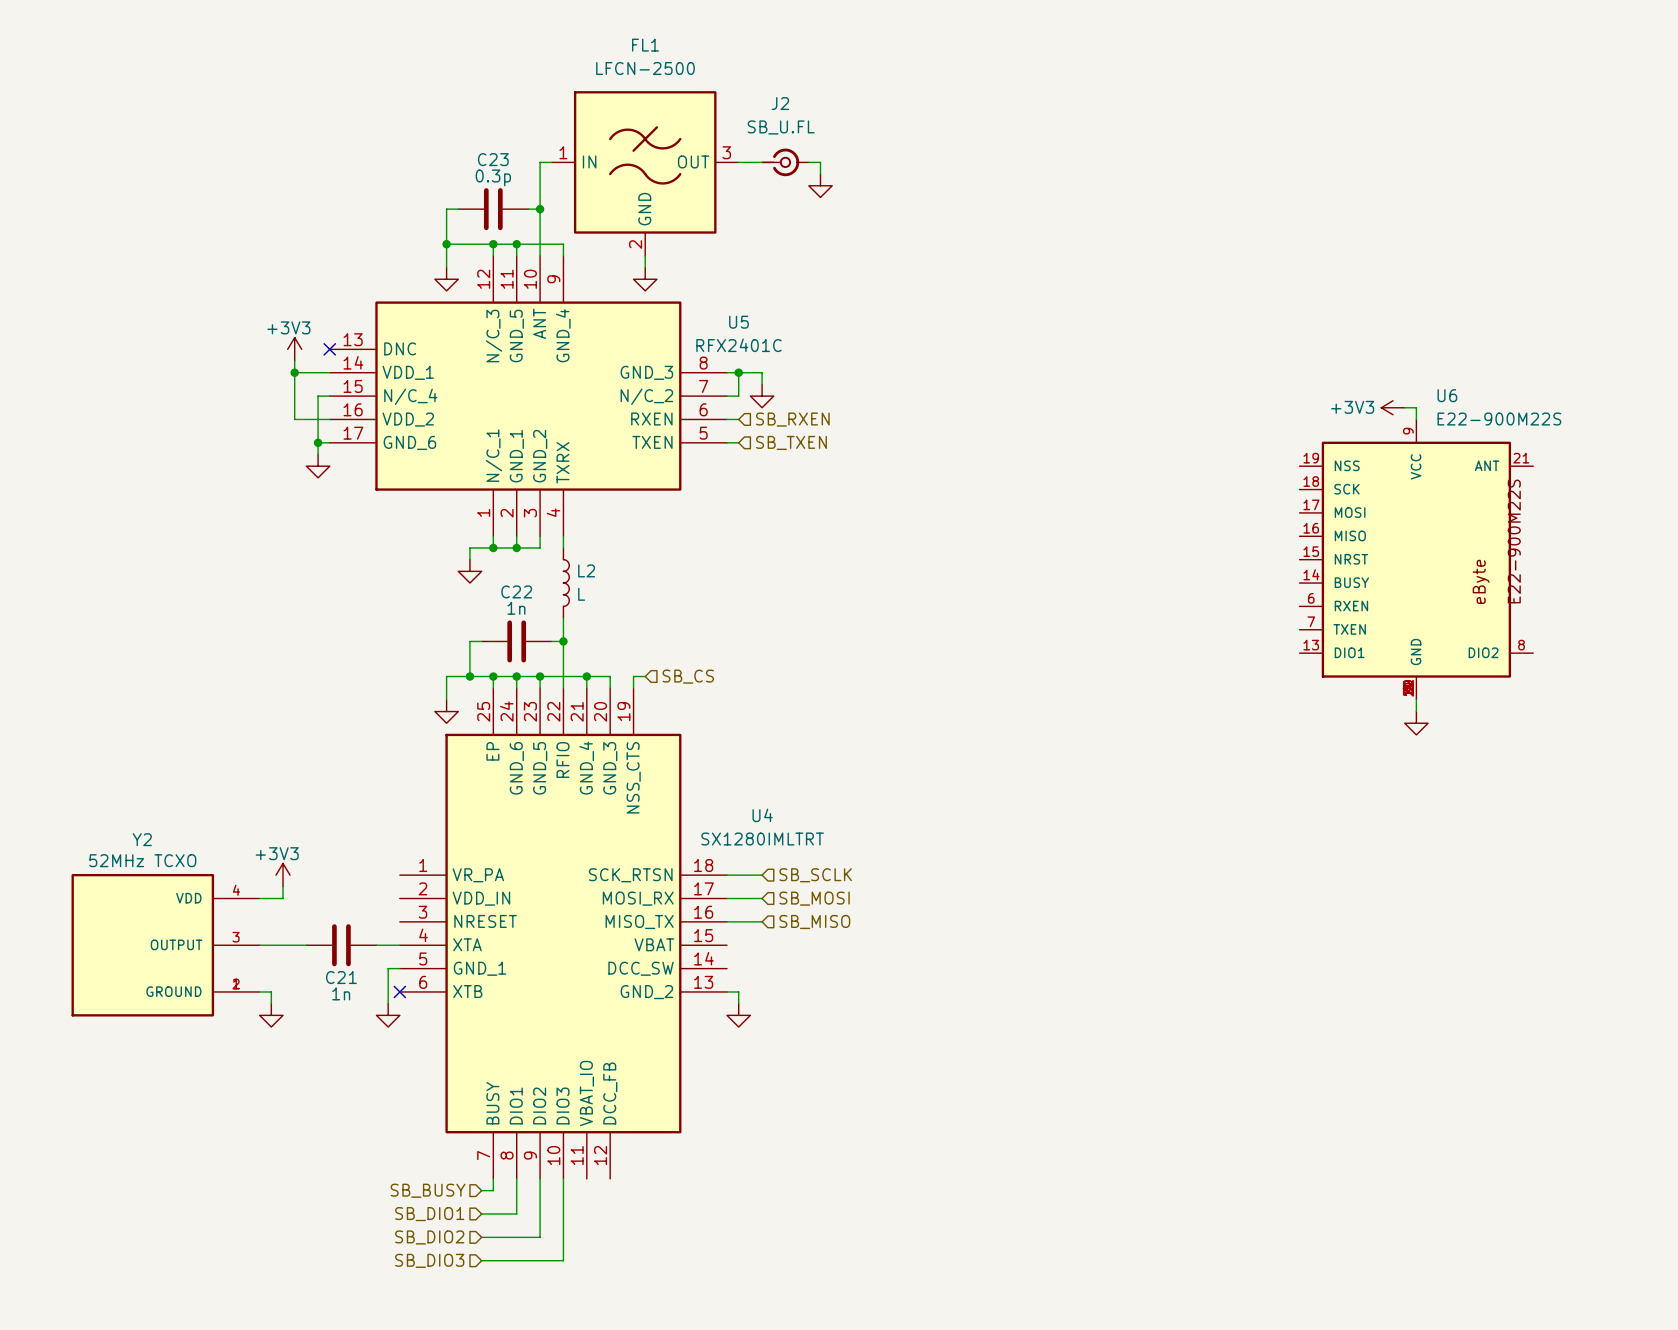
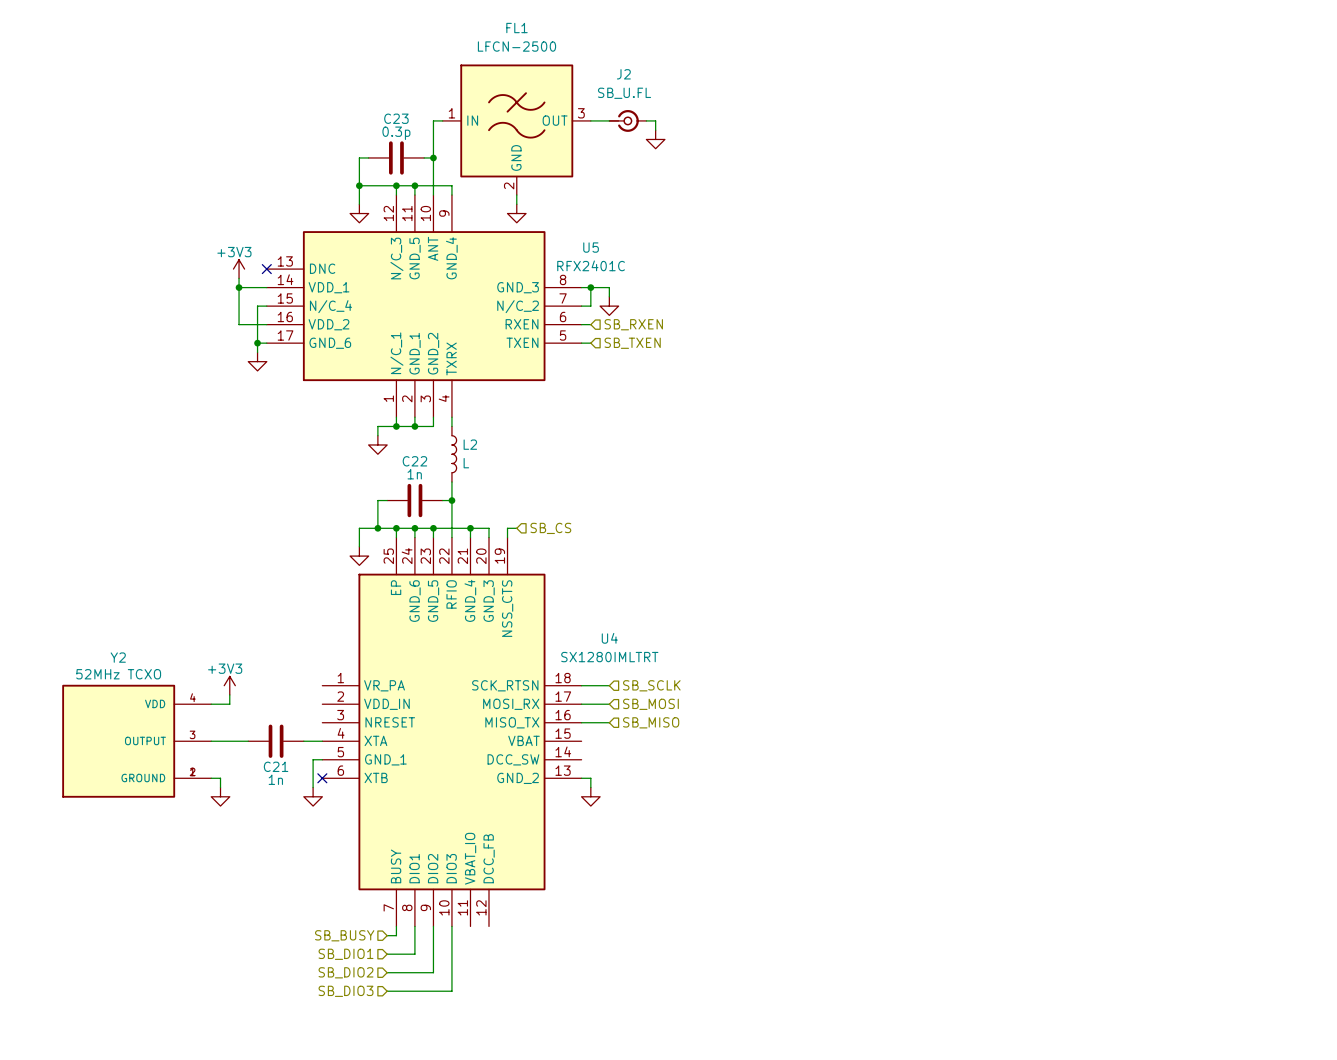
power symbol: +3V3 (1393, 407) -> none
wire: (1404, 407) (1416, 407) (1416, 419) -> none
U6: E22-900M22S (1416, 559) -> none
wire: (1416, 699) (1416, 711) -> none
power symbol: (1416, 723) -> none

